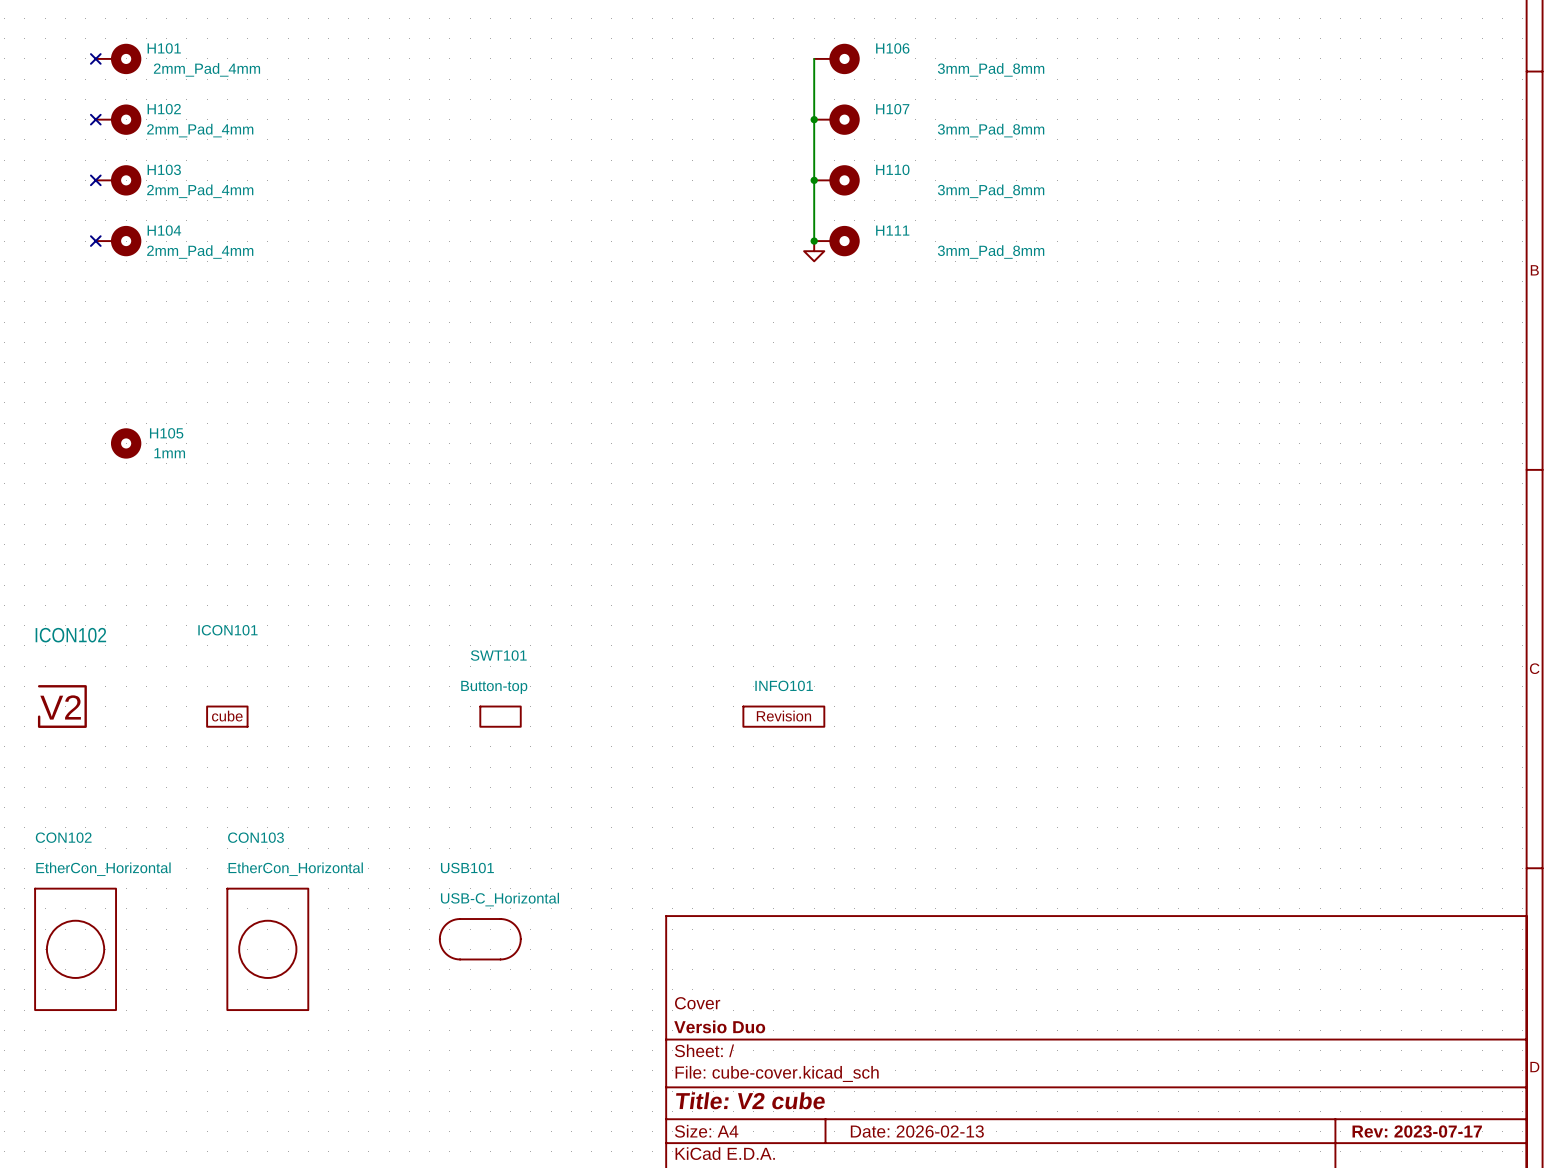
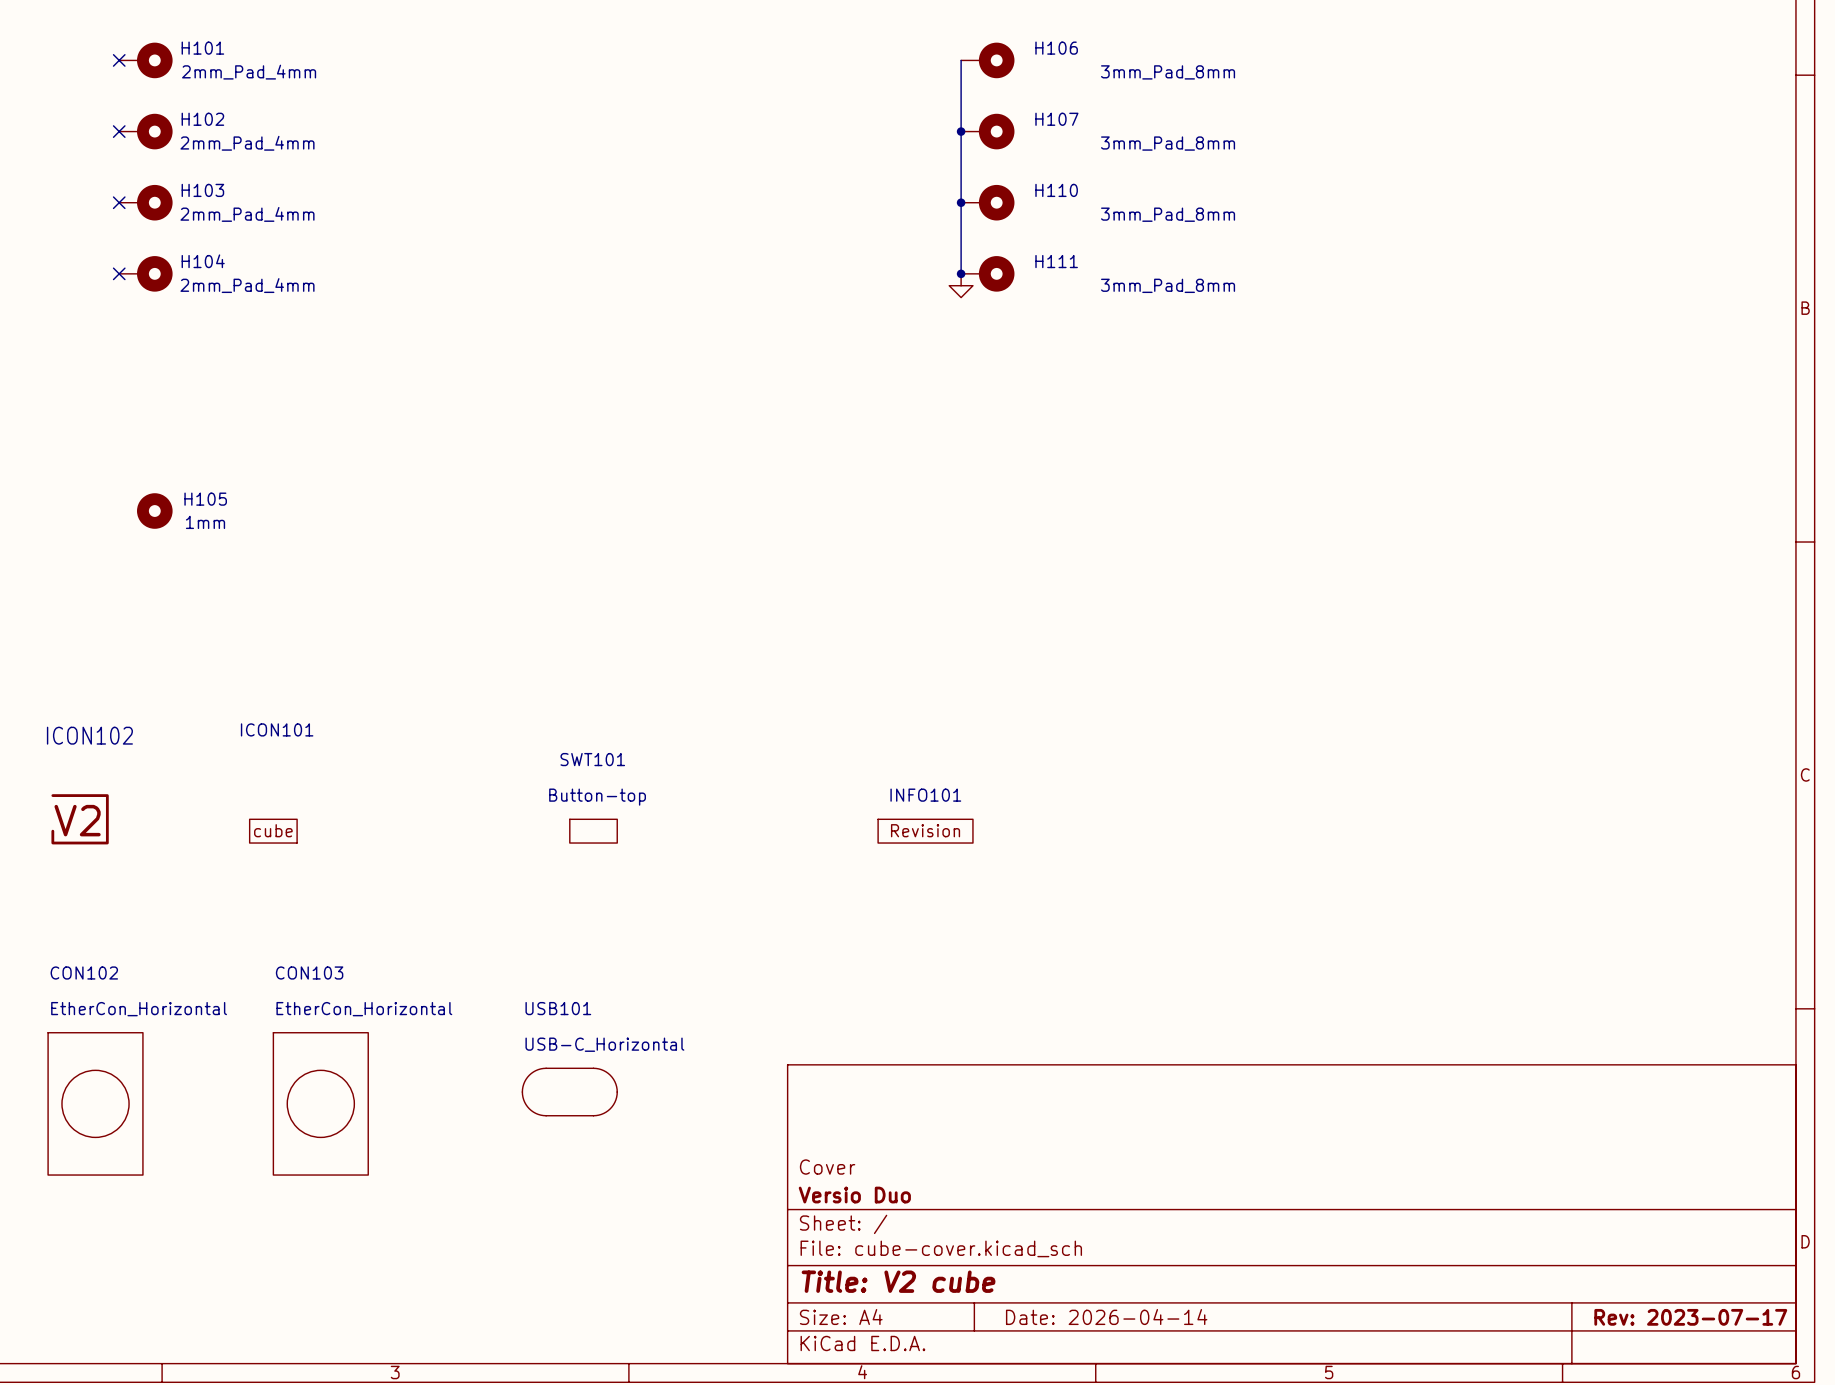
title block: Date: 2026-02-13 (917, 1131) -> Date: 2026-04-14 (1106, 1317)

